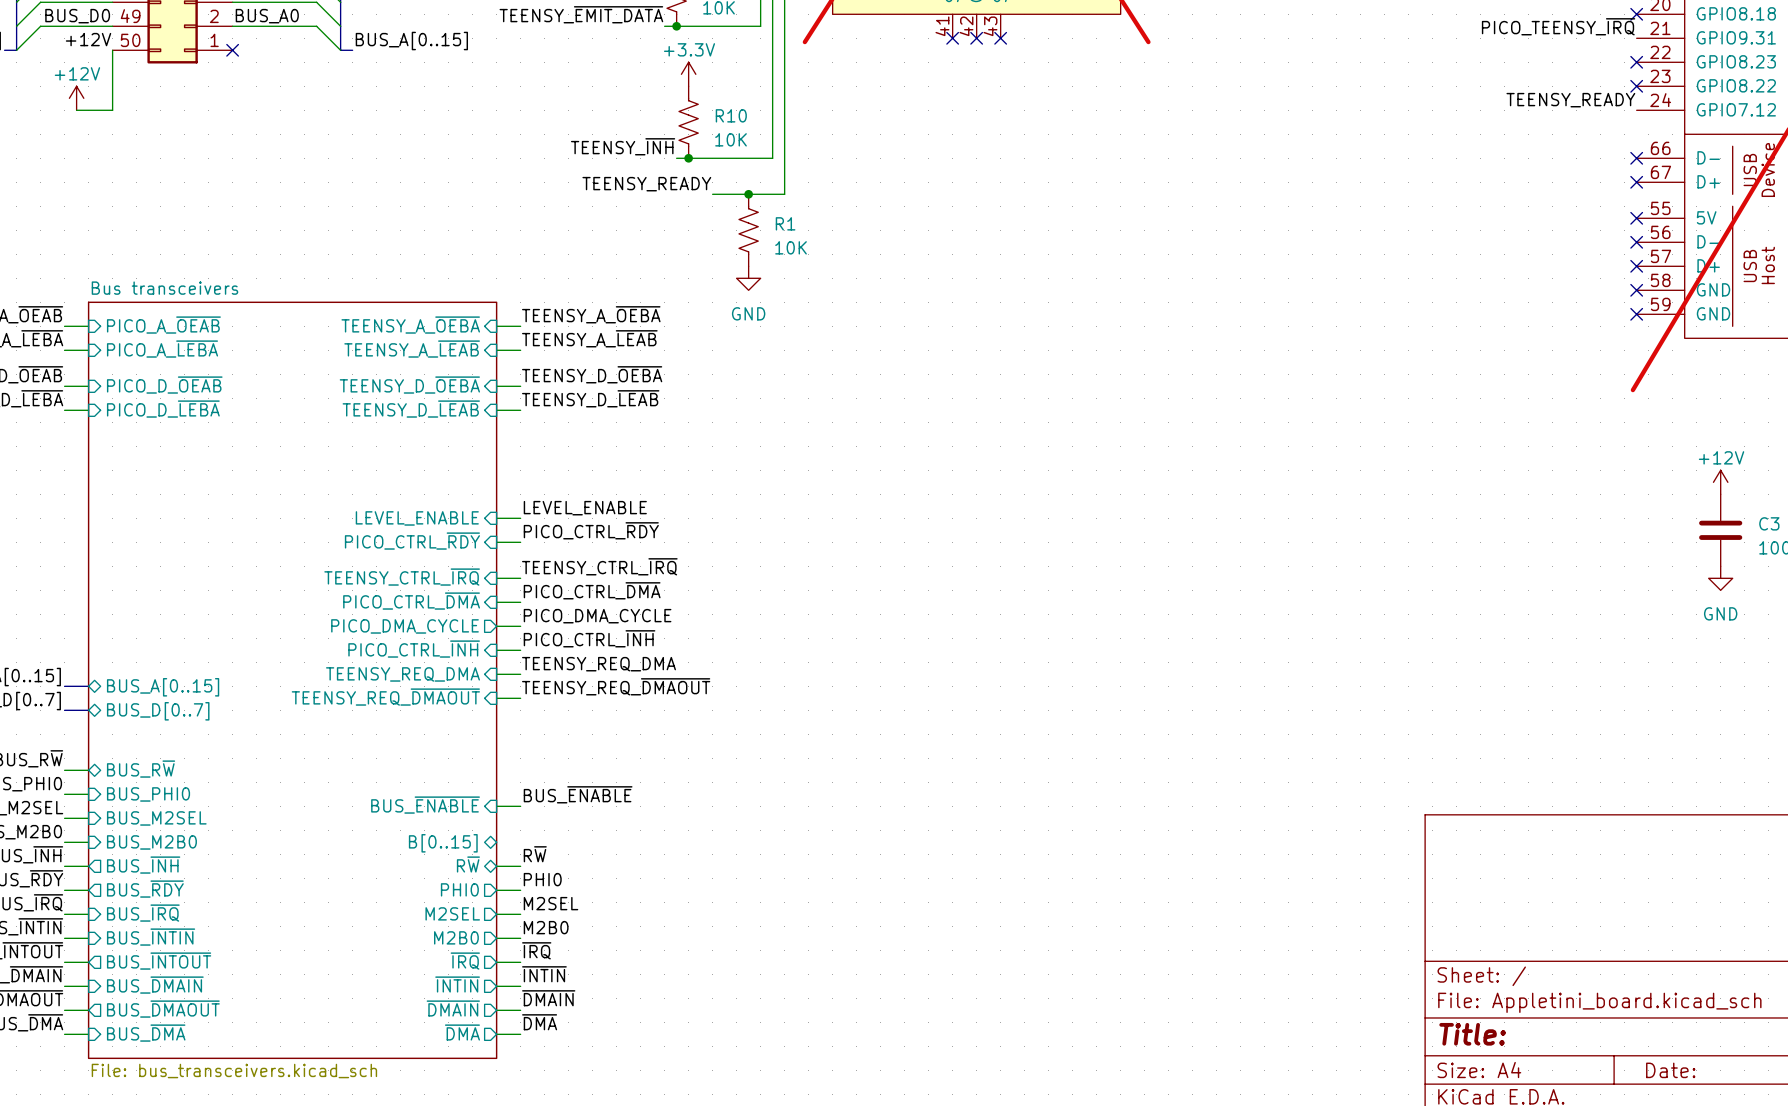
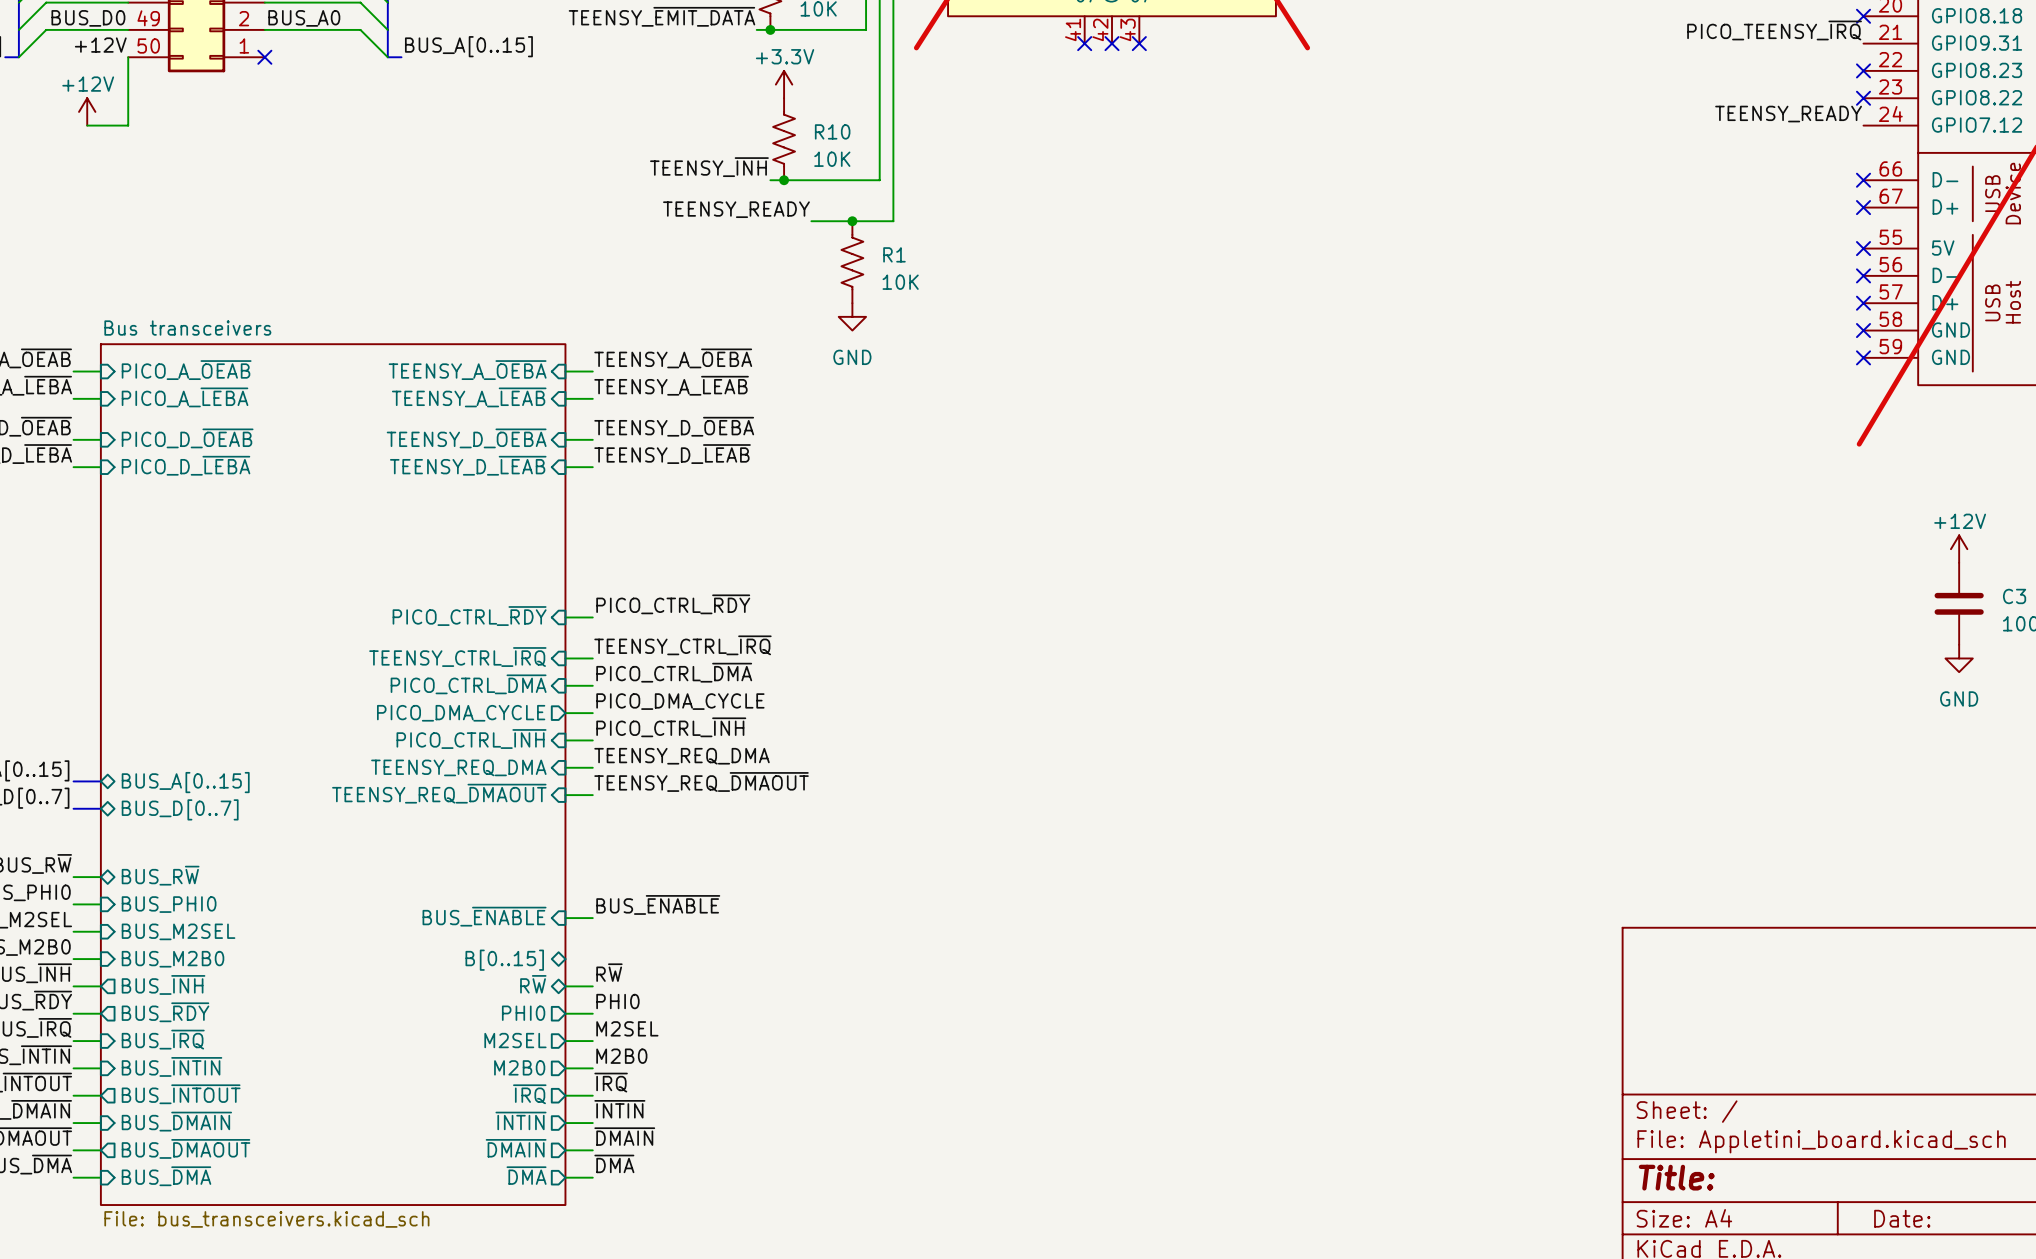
label: LEVEL_ENABLE (585, 508) -> none
sheet pin: LEVEL_ENABLE (417, 518) -> none
wire: (496, 518) (520, 518) -> none

